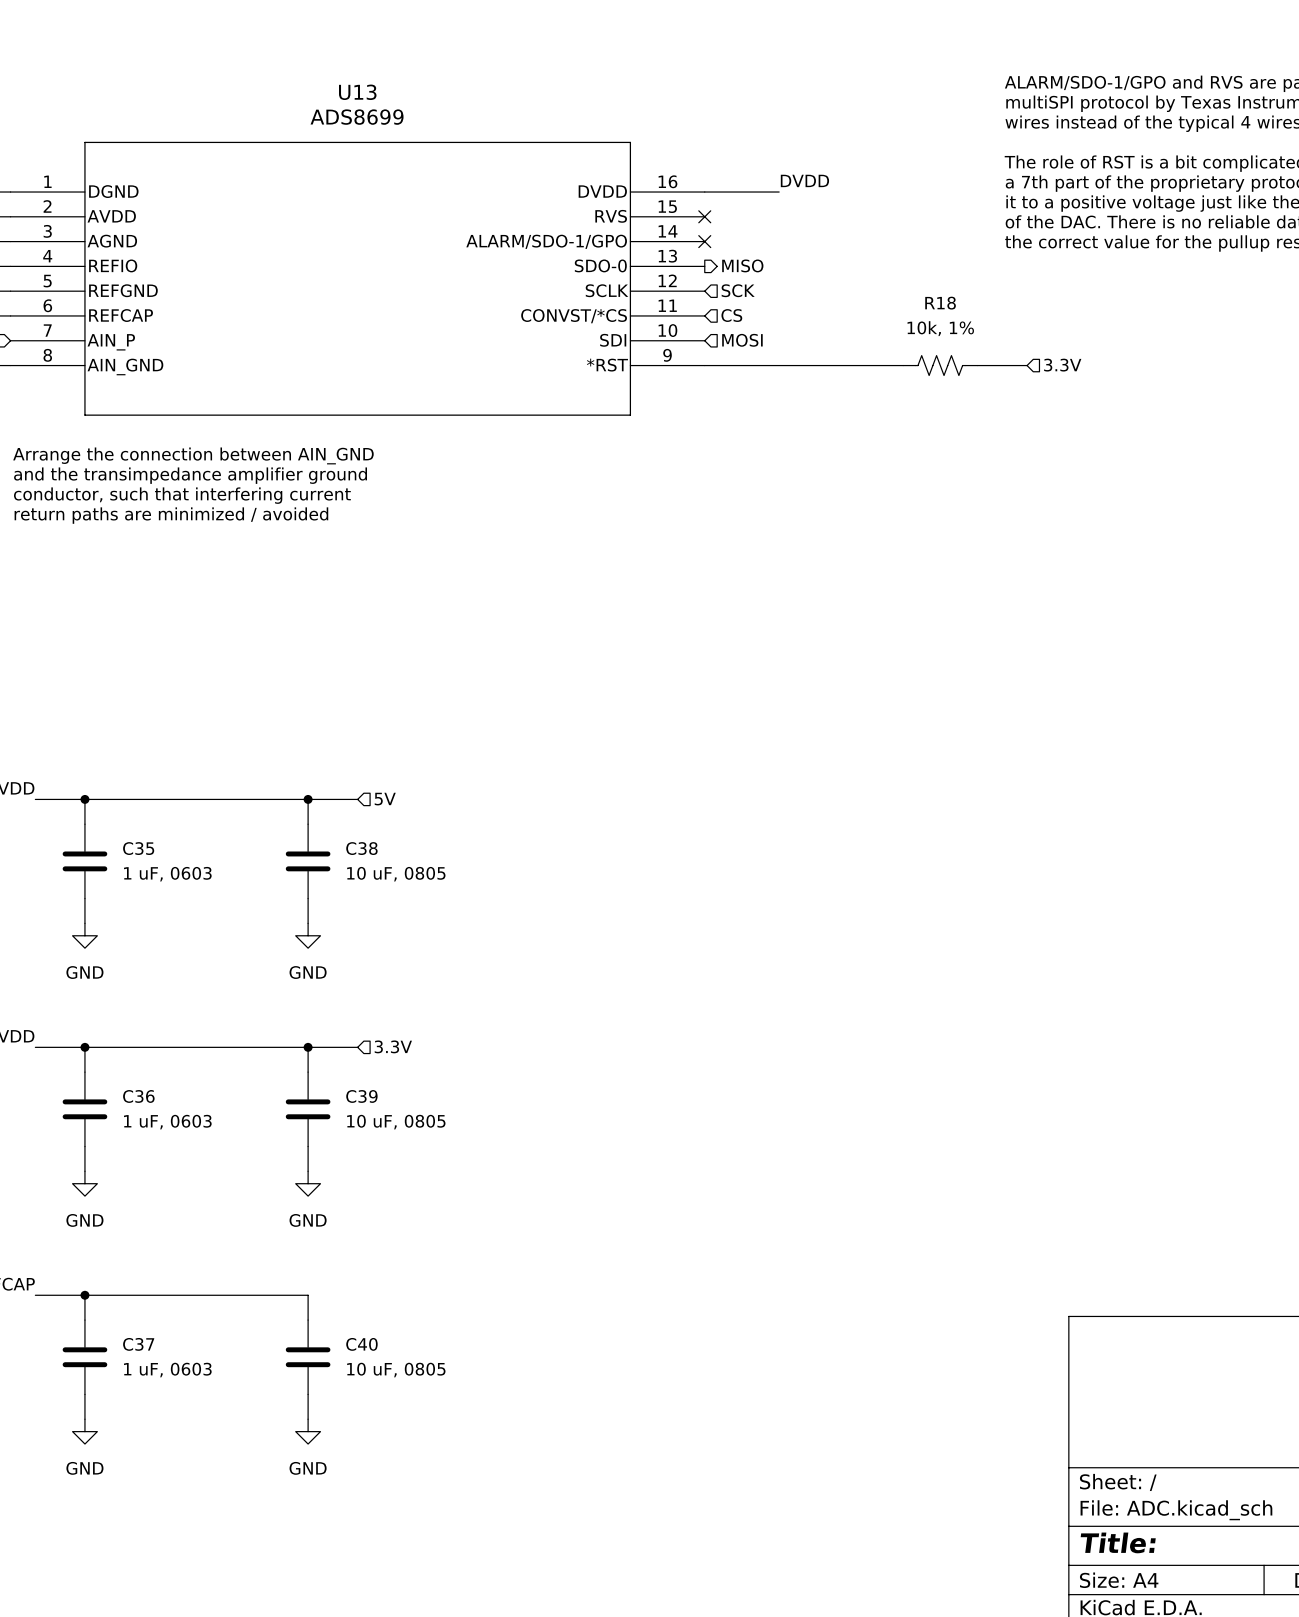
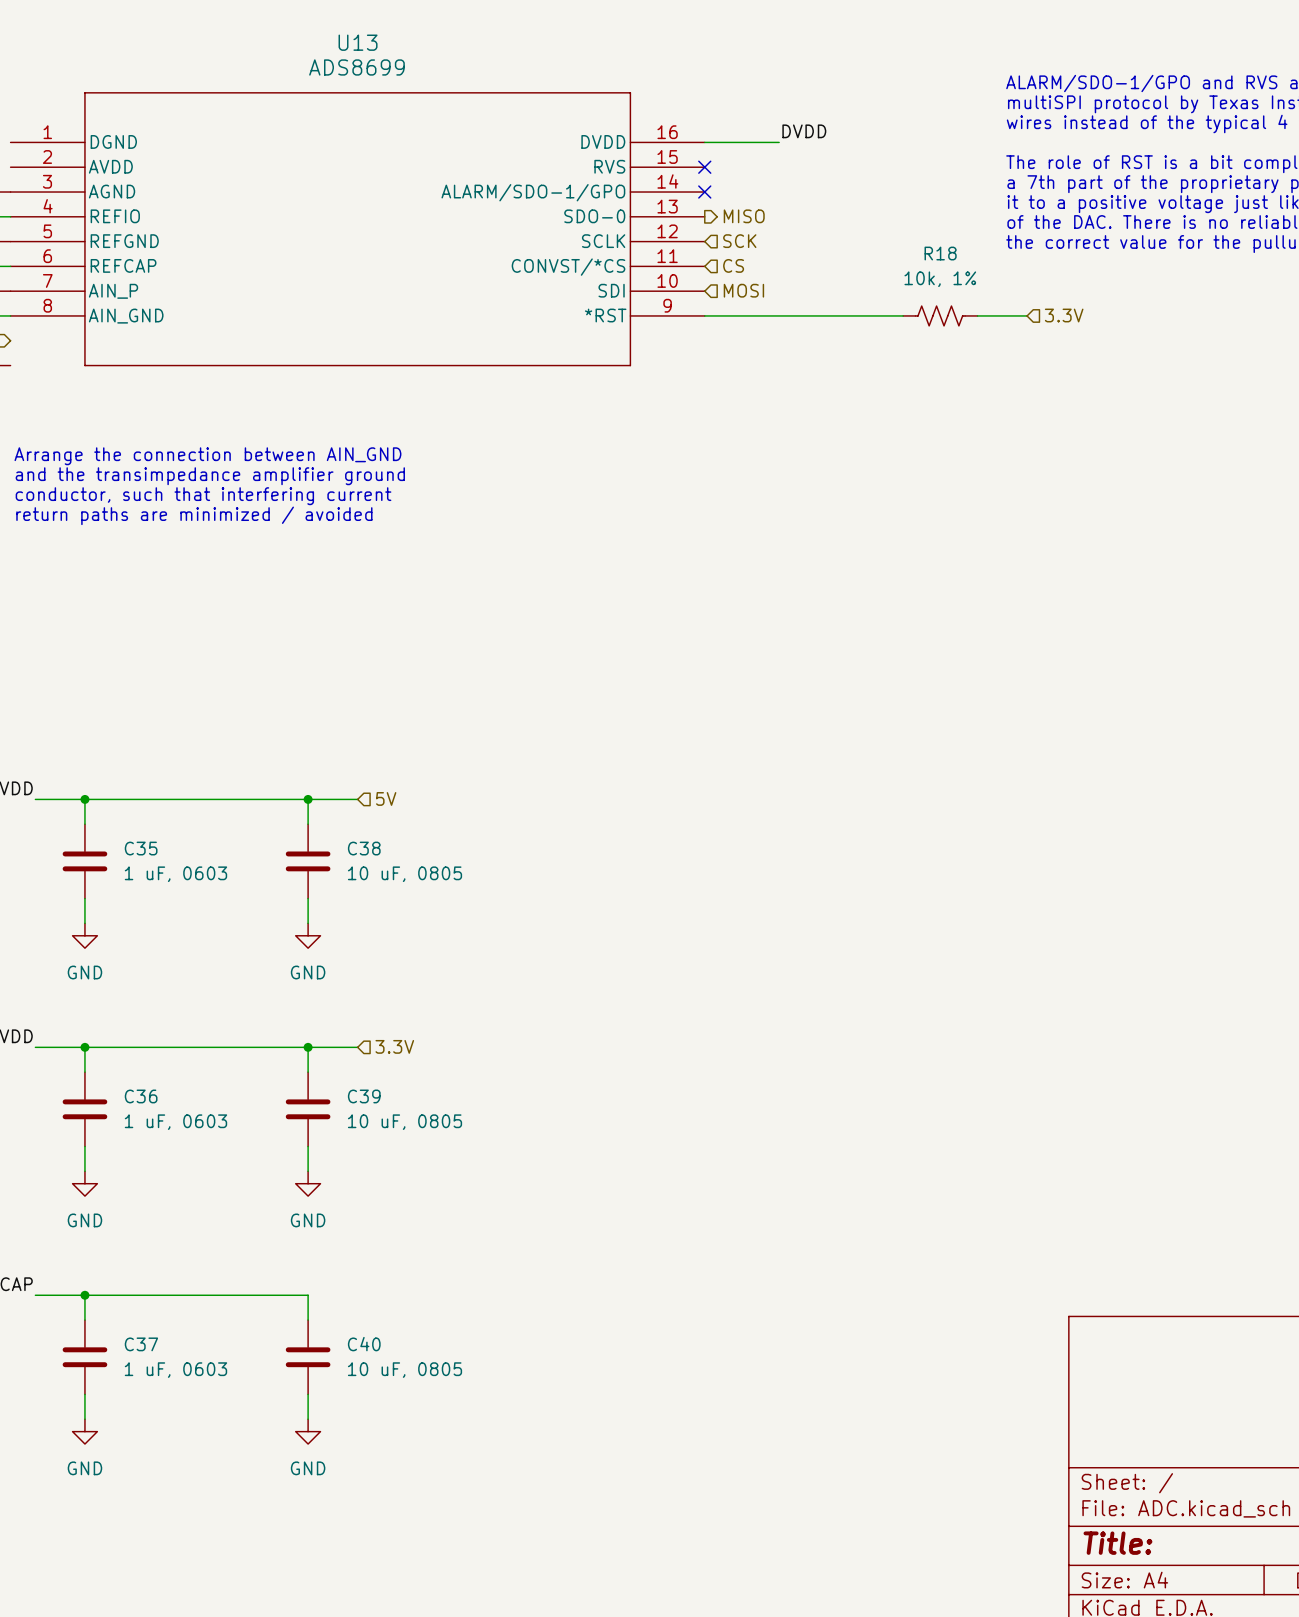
no-connect mark: none -> (704, 167)
label position: DVDD (804, 180) -> DVDD (804, 131)
wire: (704, 192) (779, 192) -> (704, 142) (779, 142)
no-connect mark: none -> (704, 192)
no-connect mark: (704, 216) -> none
hierarchical label: none -> MISO (744, 216)
no-connect mark: (704, 241) -> none
hierarchical label: none -> SCK (739, 241)
hierarchical label shape: output (742, 265) -> input (733, 265)
hierarchical label: MISO (742, 265) -> CS (733, 265)
U13 position: (357, 278) -> (357, 229)
hierarchical label: SCK (738, 290) -> MOSI (743, 290)
hierarchical label: CS (731, 315) -> none
hierarchical label: MOSI (742, 340) -> none
wire: (704, 365) (903, 365) -> (704, 315) (903, 315)
R18 position: (940, 365) -> (940, 315)
wire: (977, 365) (1027, 365) -> (977, 315) (1027, 315)
hierarchical label position: 3.3V (1062, 365) -> 3.3V (1064, 315)

